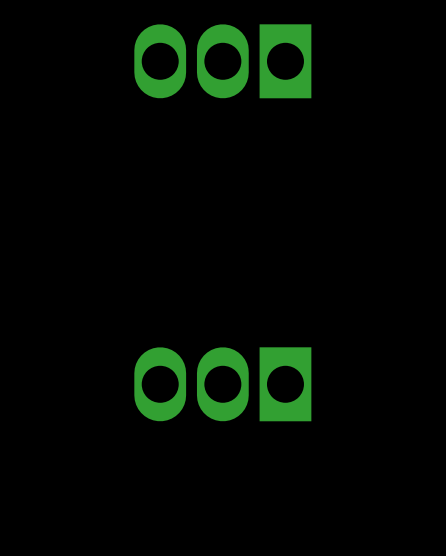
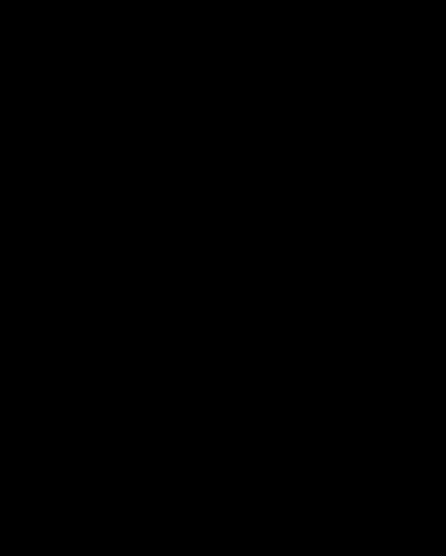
part: (222, 61) -> none
part: (222, 384) -> none

